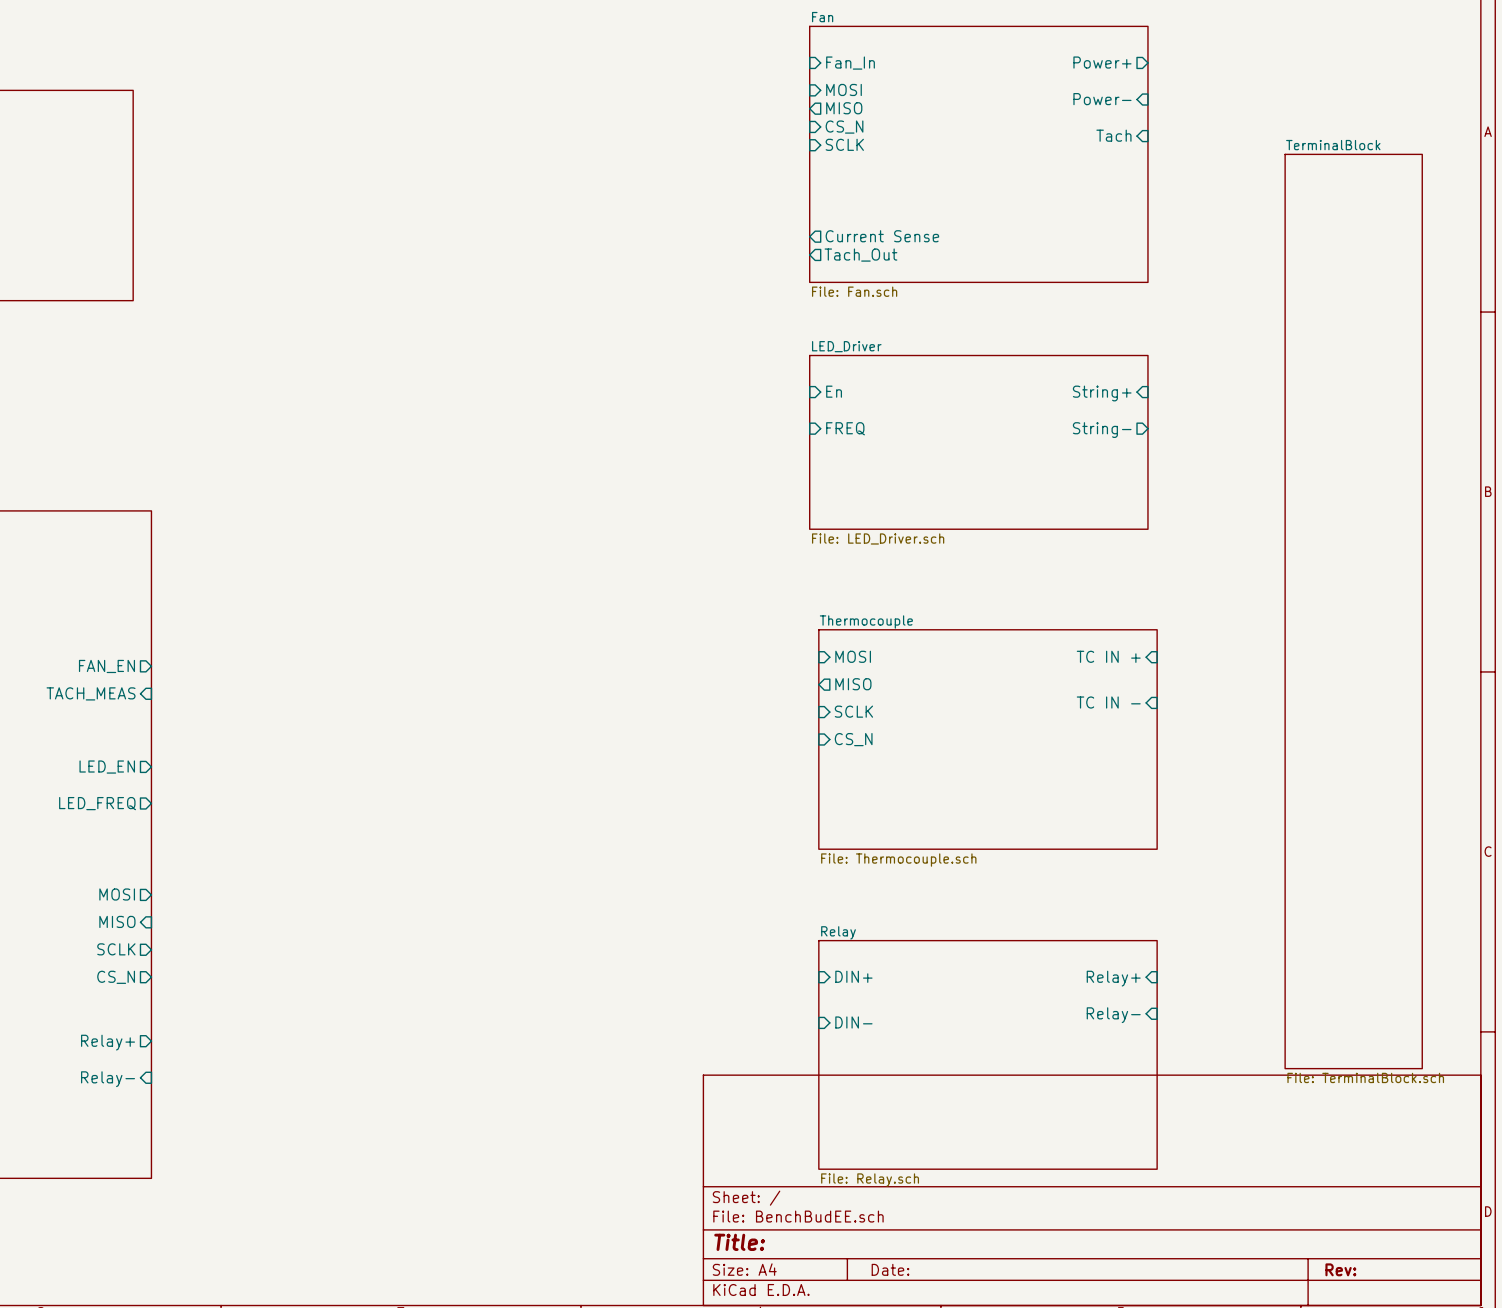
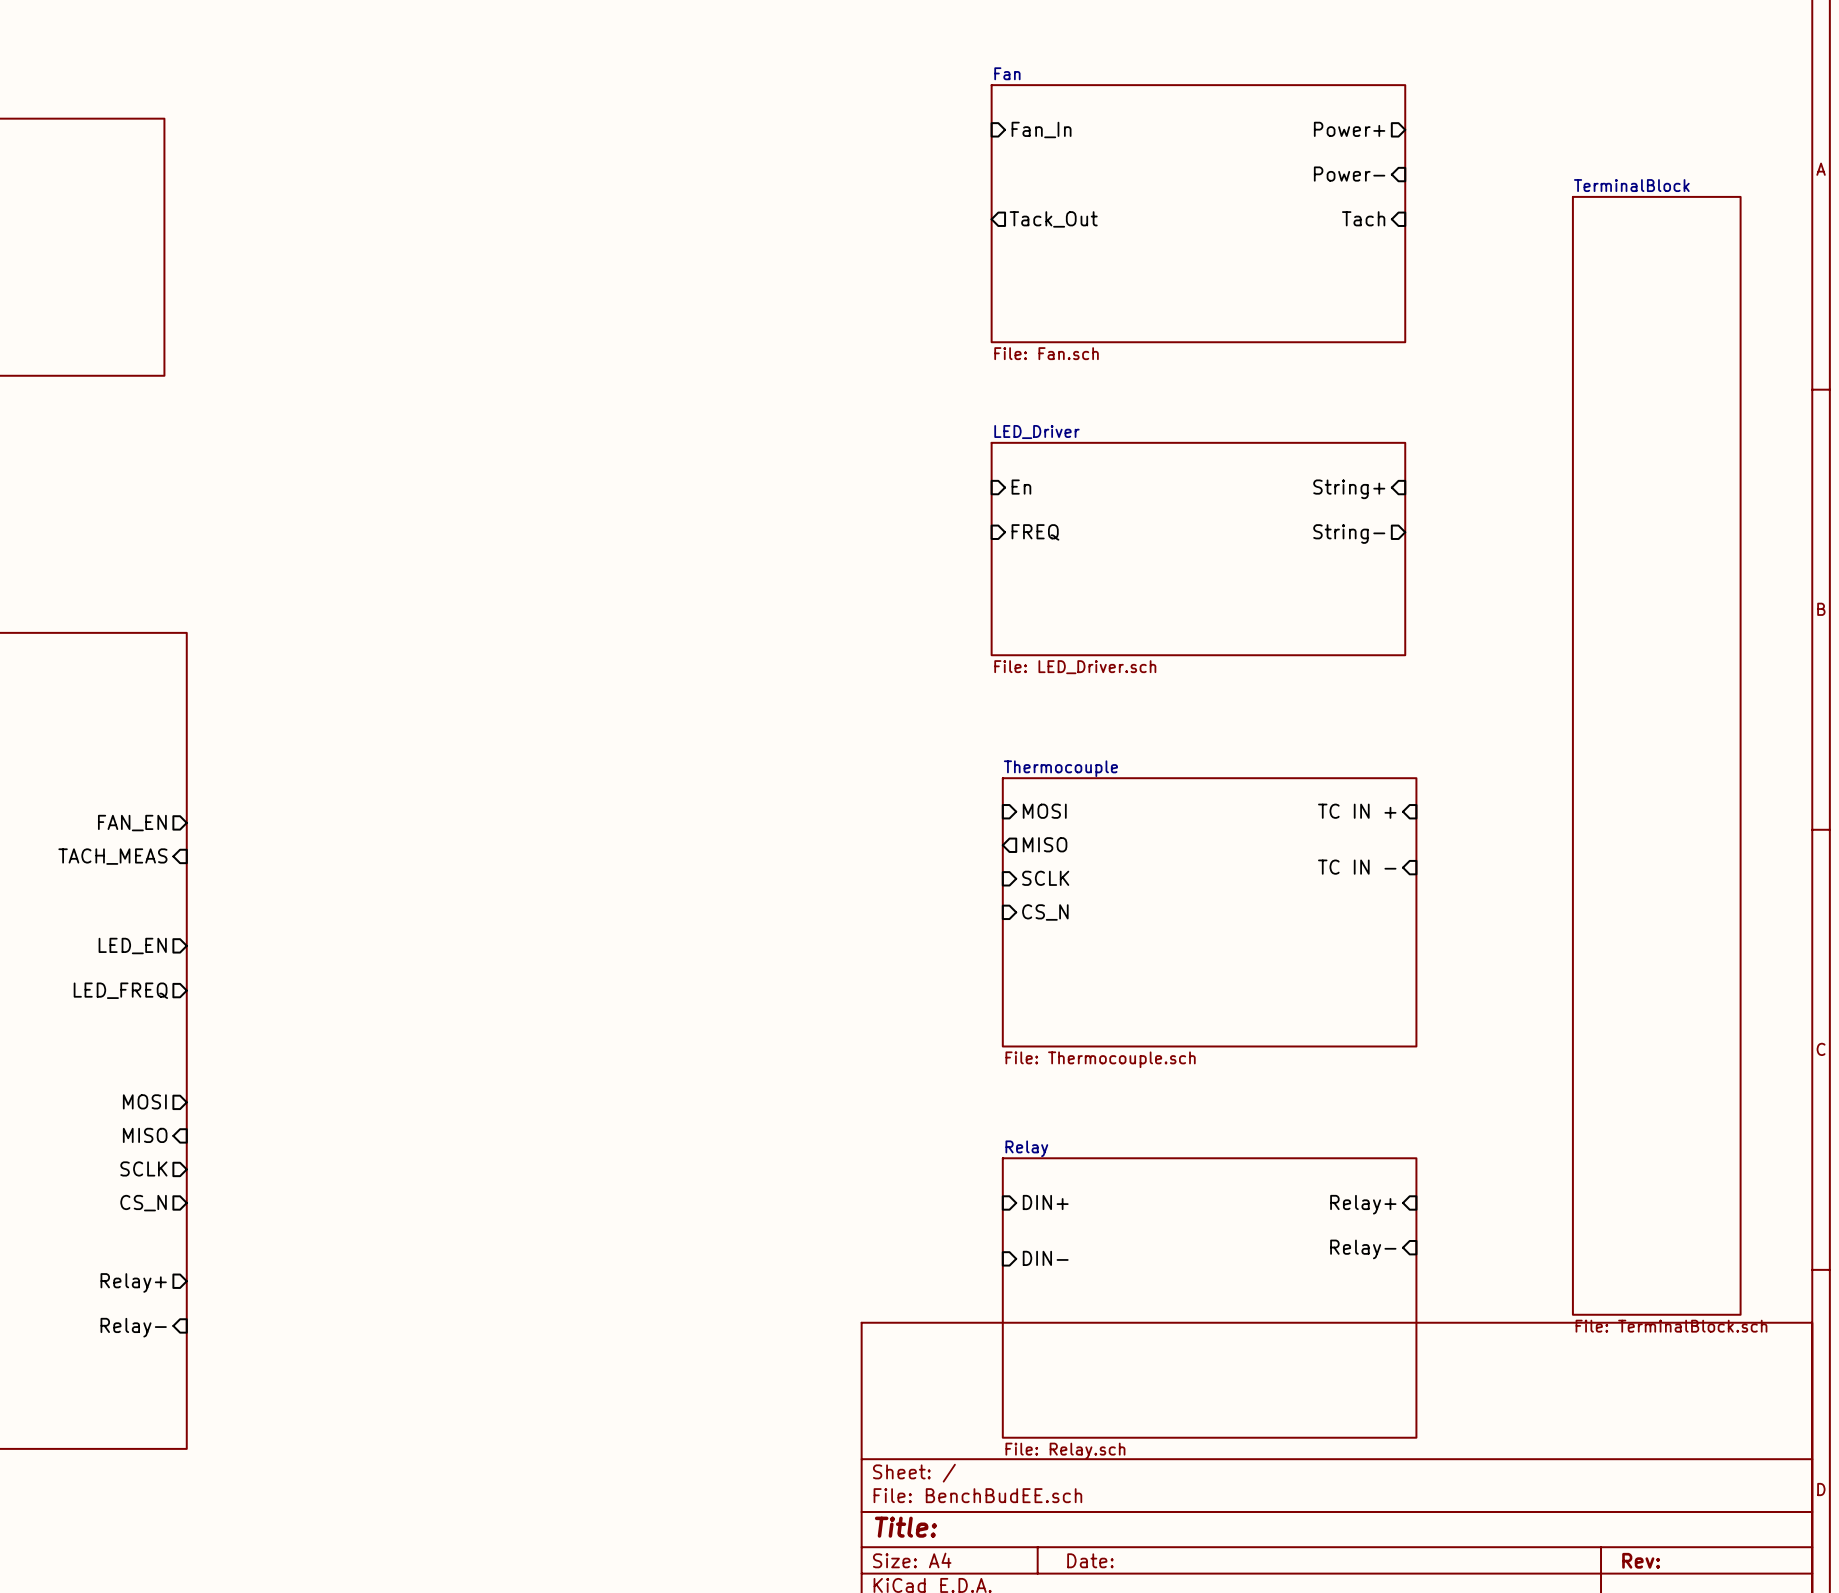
sheet pin: Power+ (1102, 62) -> none
sheet pin position: Fan_In (850, 63) -> Fan_In (1041, 129)
sheet pin: MOSI (843, 89) -> none
sheet pin shape: input (1102, 99) -> output (1349, 129)
sheet pin: Power- (1102, 99) -> Power+ (1349, 129)
sheet pin: MISO (844, 108) -> none
sheet pin: CS_N (844, 127) -> none
sheet pin: Tach (1113, 135) -> Power- (1349, 174)
sheet pin: SCLK (844, 144) -> none
sheet Fan: File: Fan.sch (978, 154) -> none
sheet Fan: none -> File: Fan.sch (1198, 213)
sheet pin: none -> Tack_Out (1053, 219)
sheet pin: none -> Tach (1363, 218)
sheet pin: Current Sense (882, 236) -> none
sheet pin: Tach_Out (860, 255) -> none

